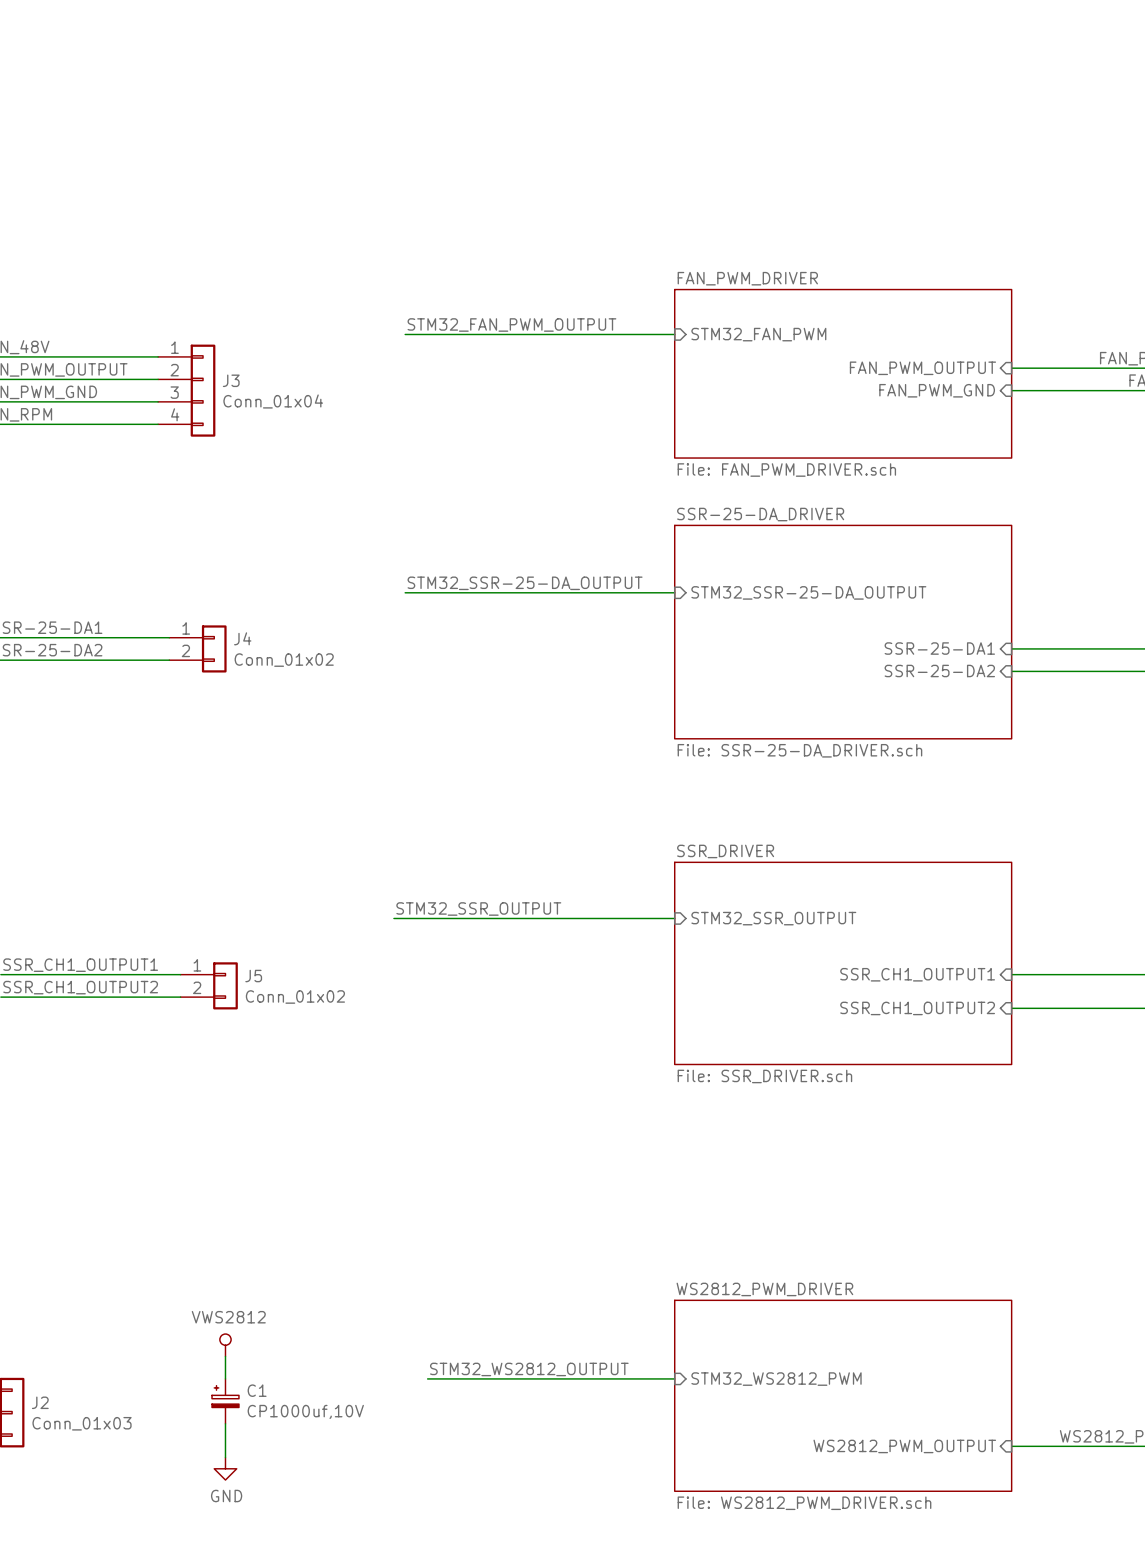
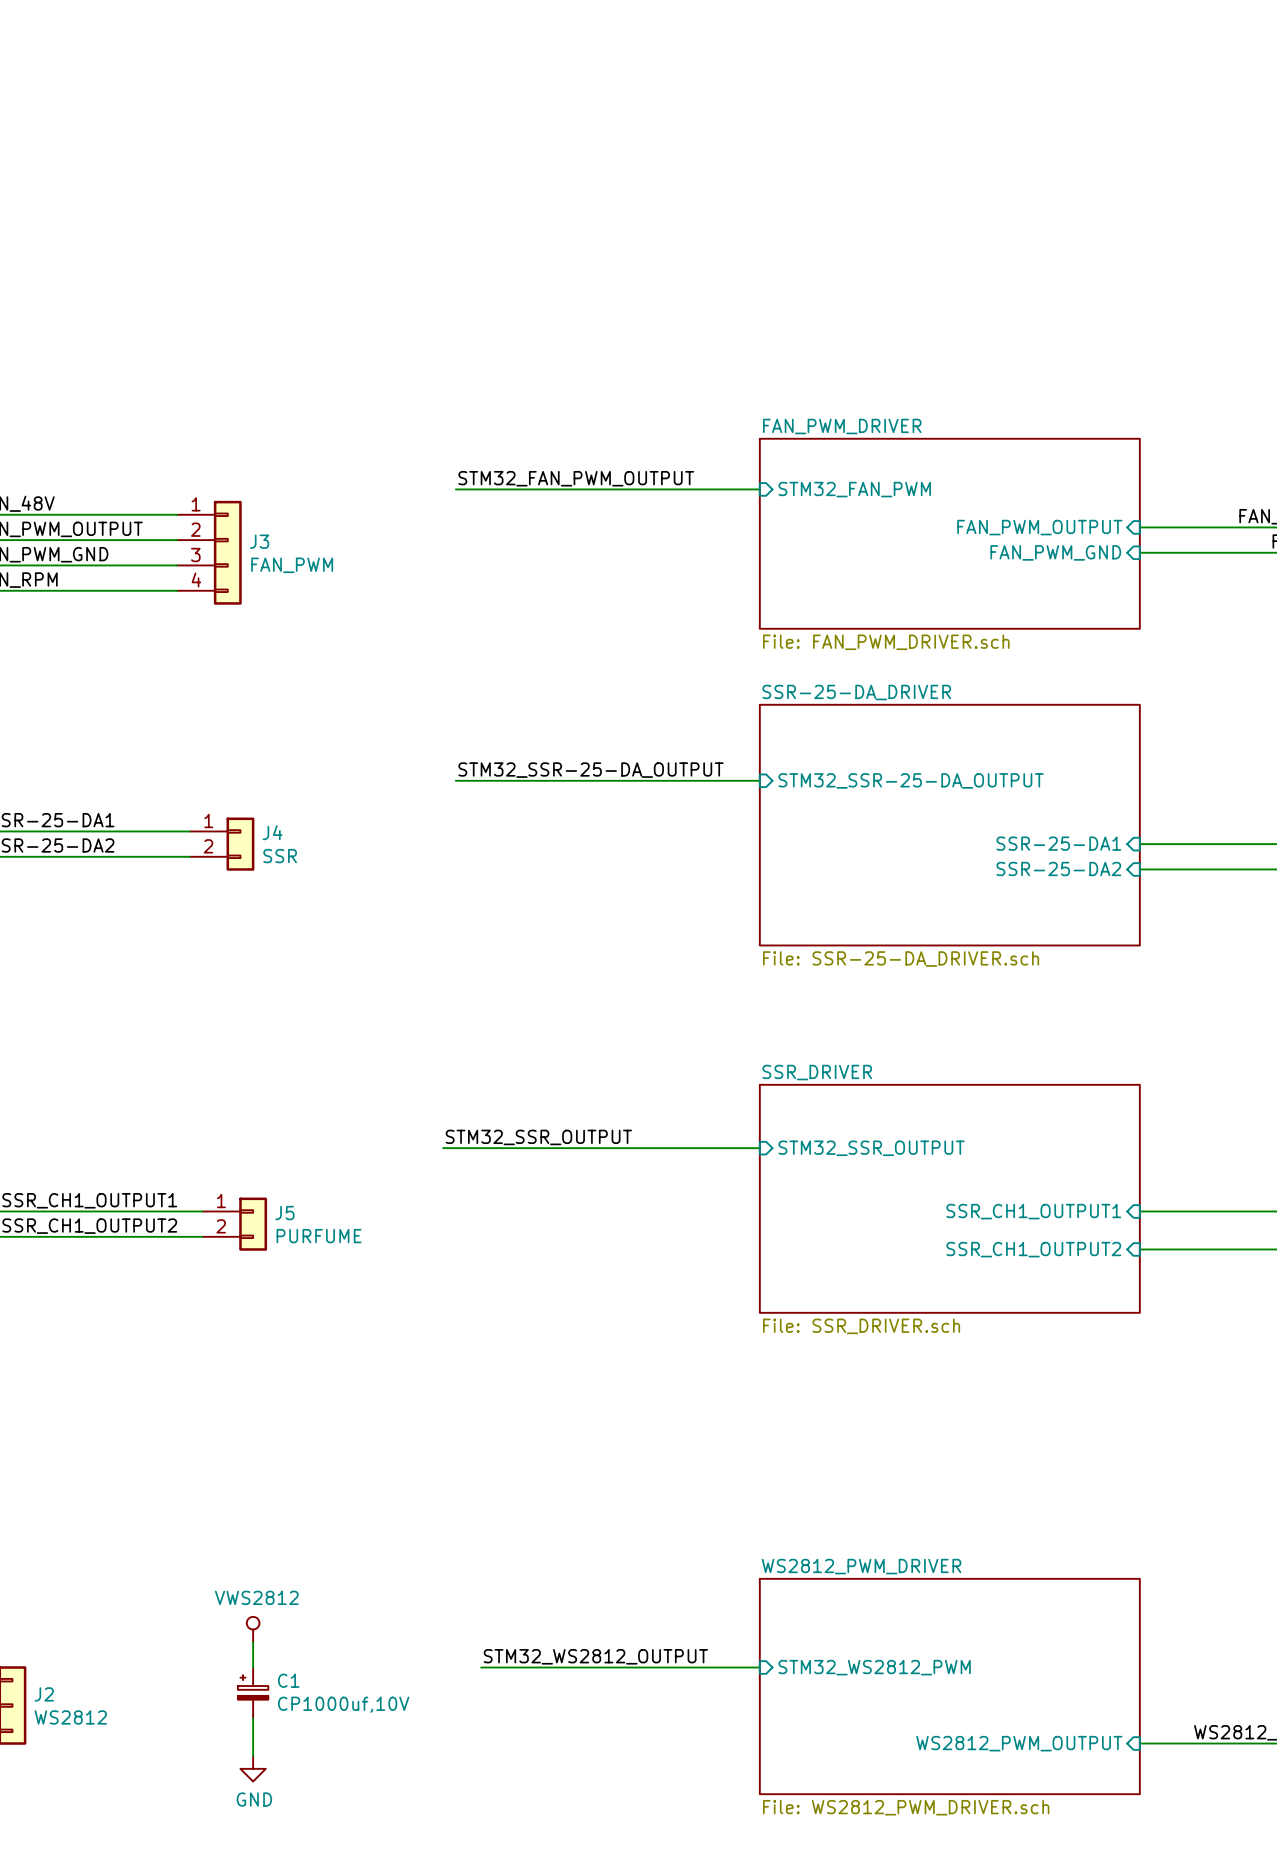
J3 value: Conn_01x04 (273, 401) -> FAN_PWM (292, 565)
J4 value: Conn_01x02 (284, 660) -> SSR (280, 856)
J5 value: Conn_01x02 (295, 996) -> PURFUME (319, 1236)
J2 value: Conn_01x03 (82, 1423) -> WS2812 (70, 1717)

